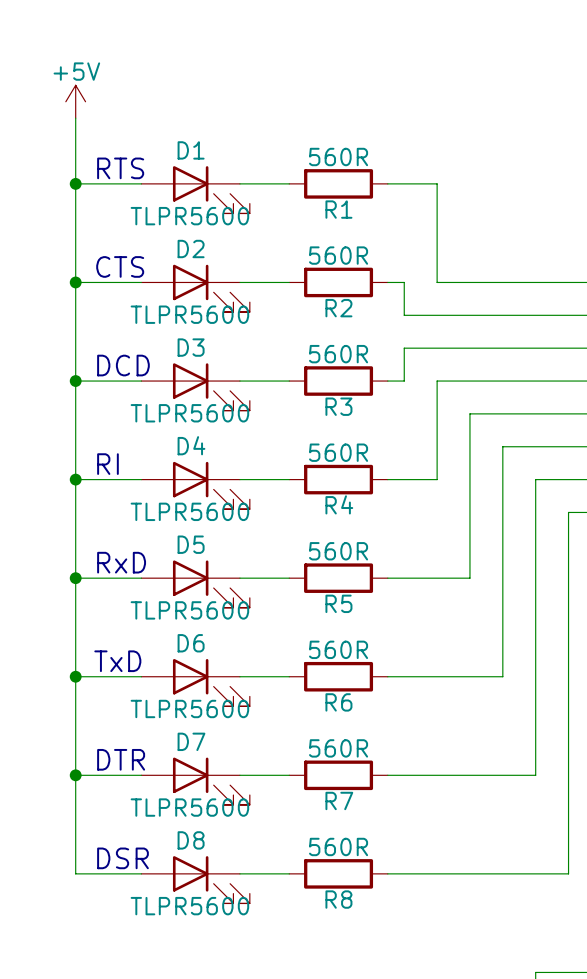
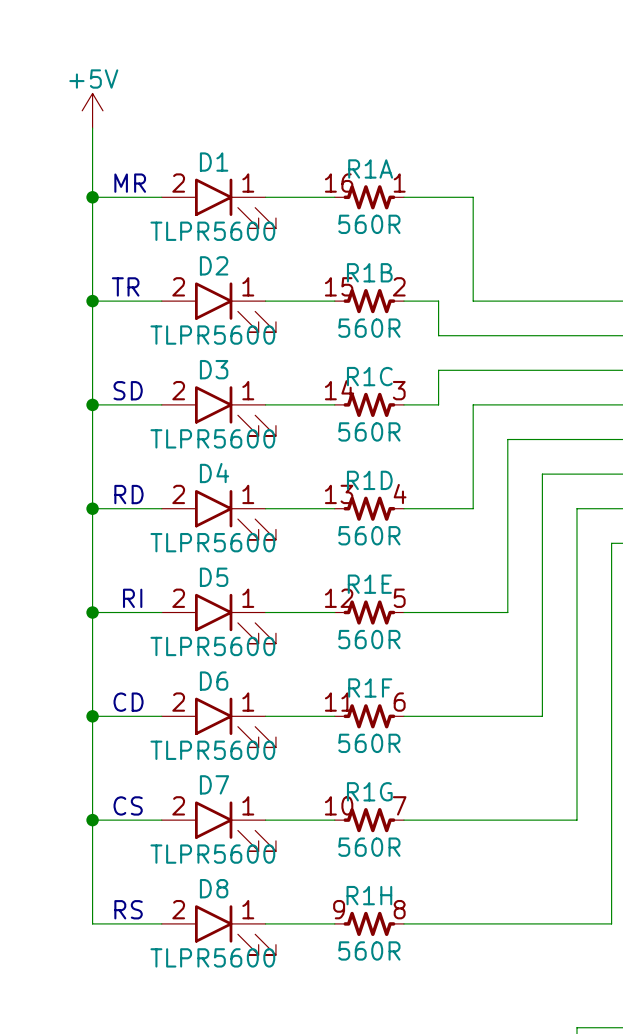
D1 symbol: [141, 166, 250, 214] -> [161, 178, 276, 229]
text: RTS (120, 168) -> MR (130, 183)
R1: 560R (338, 183) -> none
R1A: none -> 560R (369, 197)
D2 symbol: [141, 264, 250, 313] -> [161, 282, 276, 333]
text: CTS (120, 266) -> TR (125, 286)
R2: 560R (338, 282) -> none
R1B: none -> 560R (369, 301)
D3 symbol: [141, 363, 250, 411] -> [161, 386, 276, 437]
text: DCD (123, 365) -> SD (128, 390)
R3: 560R (338, 381) -> none
R1C: none -> 560R (369, 404)
D4 symbol: [141, 461, 250, 510] -> [161, 490, 276, 540]
text: RI (107, 464) -> RD (128, 494)
R4: 560R (338, 479) -> none
R1D: none -> 560R (369, 508)
D5 symbol: [141, 560, 250, 608] -> [161, 593, 276, 644]
text: RxD (121, 562) -> RI (132, 598)
R5: 560R (338, 578) -> none
R1E: none -> 560R (369, 612)
D6 symbol: [141, 658, 250, 707] -> [161, 697, 276, 748]
text: TxD (117, 661) -> CD (128, 702)
R6: 560R (338, 676) -> none
R1F: none -> 560R (369, 716)
D7 symbol: [141, 757, 250, 805] -> [161, 801, 276, 852]
text: DTR (121, 759) -> CS (128, 805)
R7: 560R (338, 775) -> none
R1G: none -> 560R (369, 820)
D8 symbol: [141, 856, 250, 904] -> [161, 905, 276, 956]
text: DSR (122, 858) -> RS (128, 909)
R8: 560R (338, 873) -> none
R1H: none -> 560R (369, 923)

